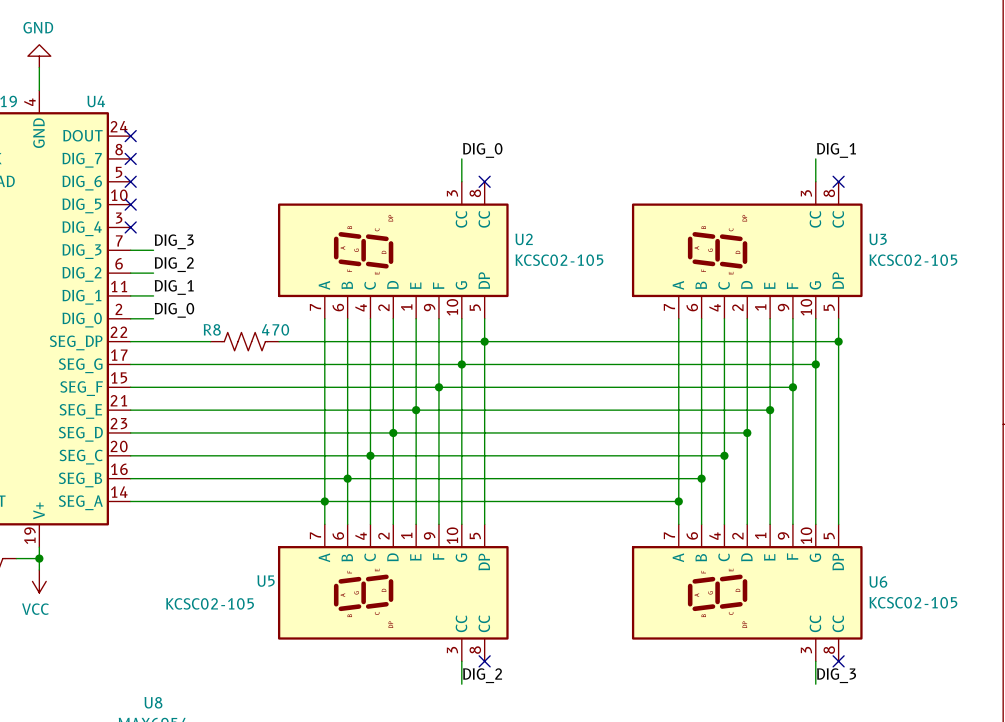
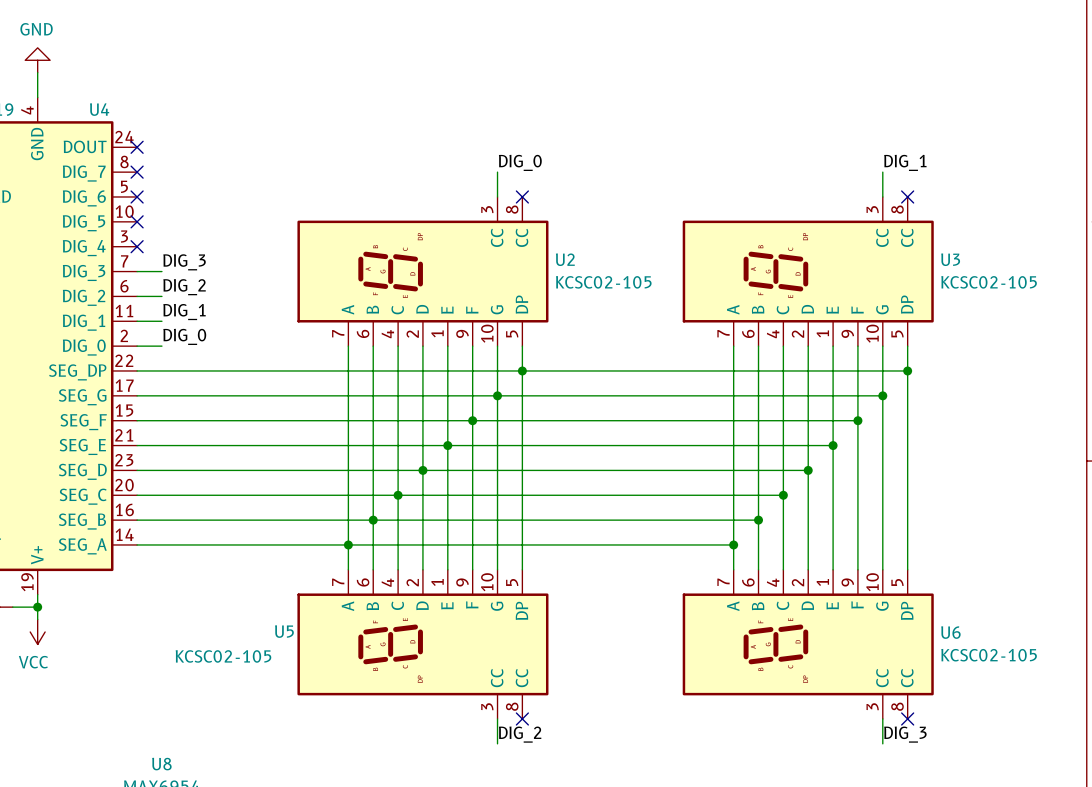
R8: 470 (244, 341) -> none

